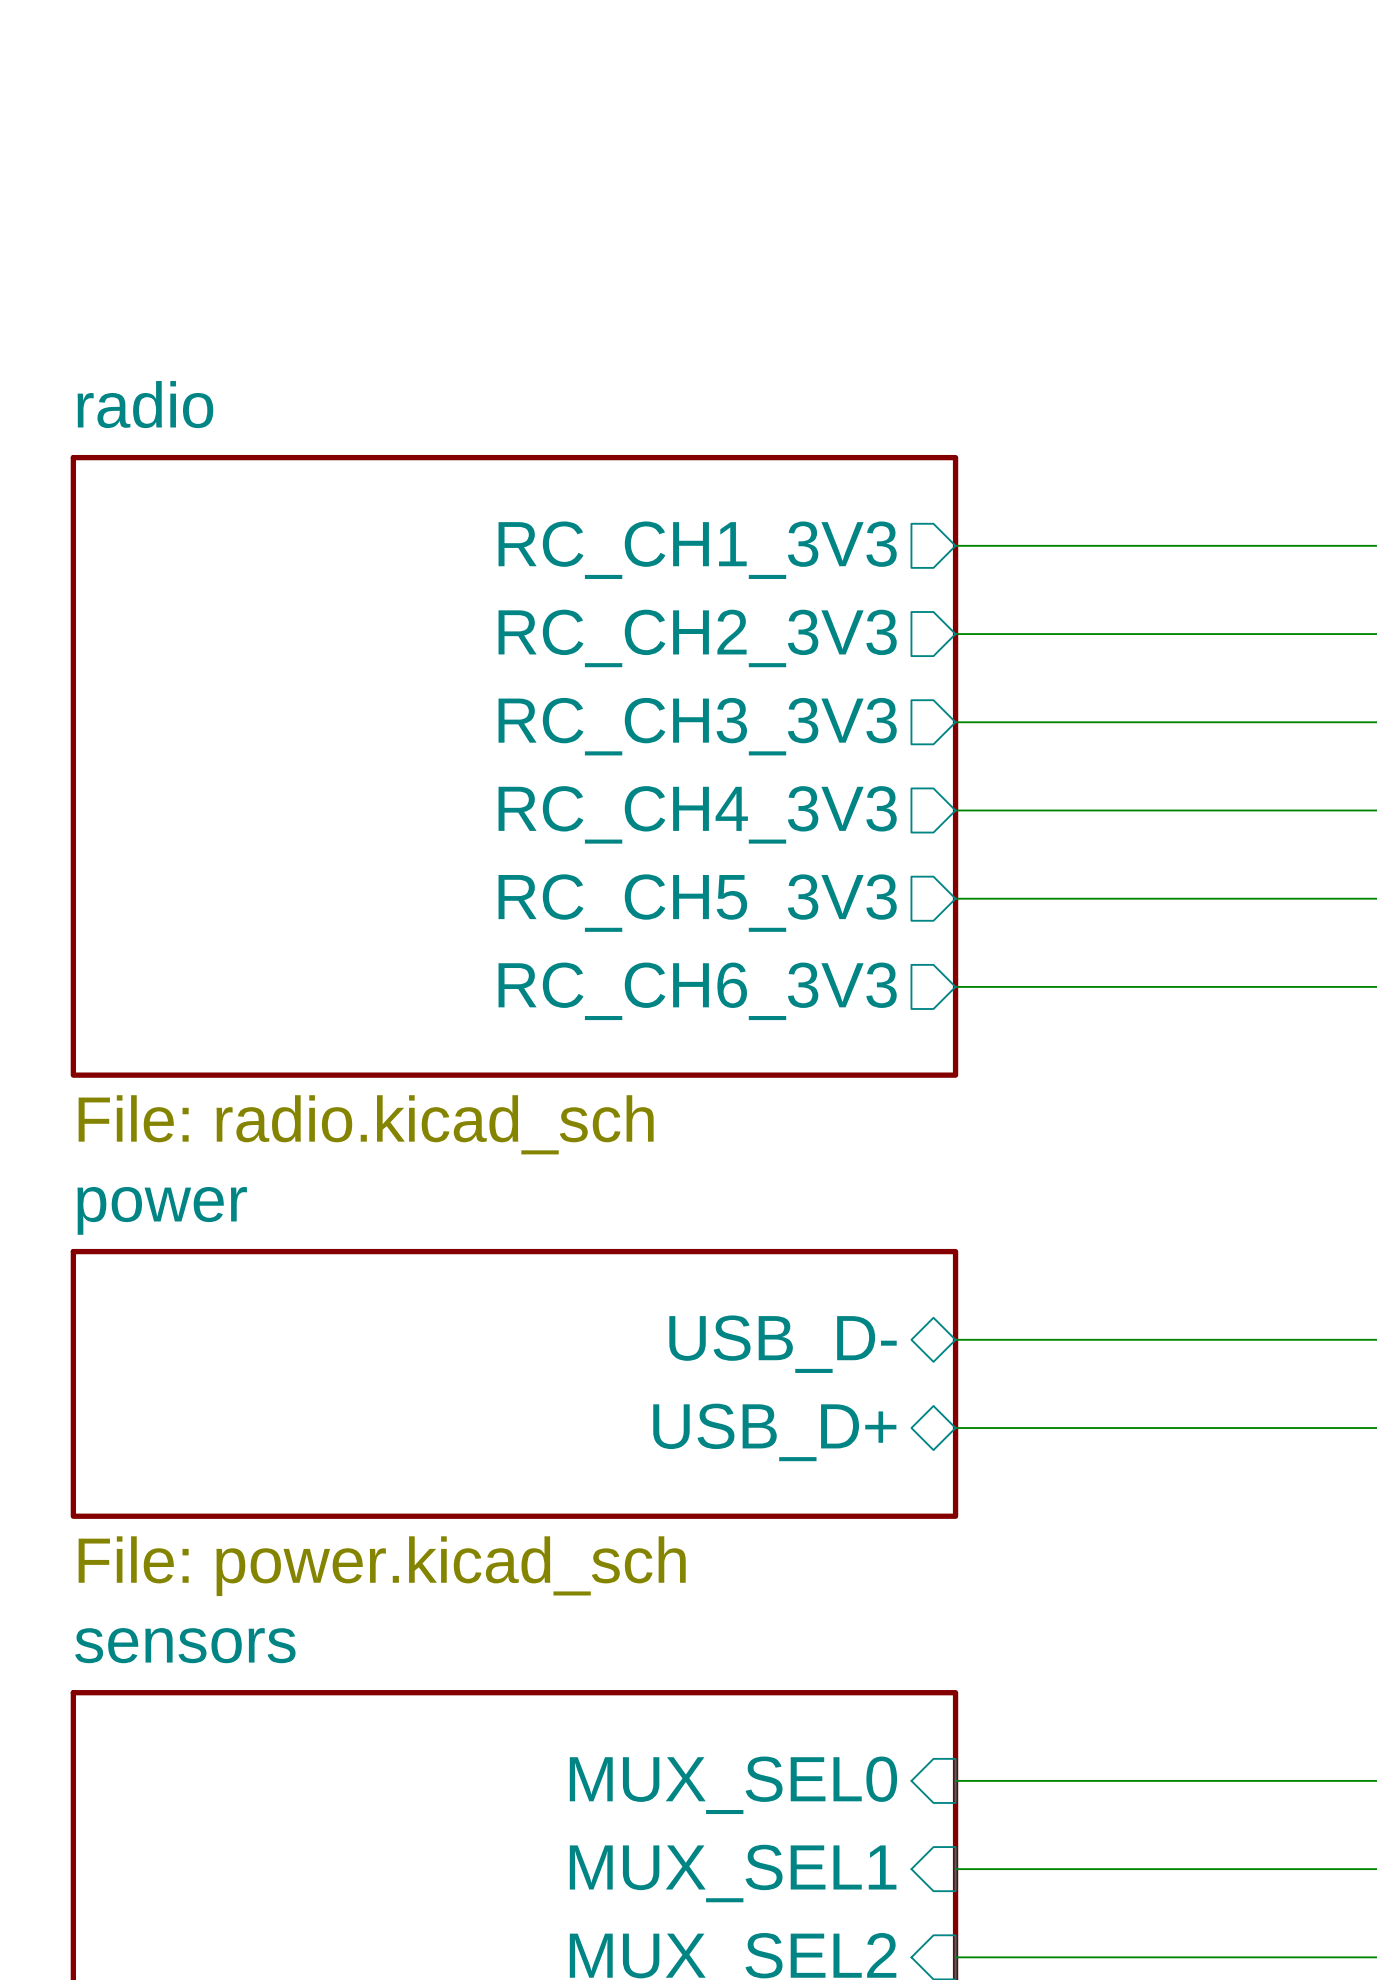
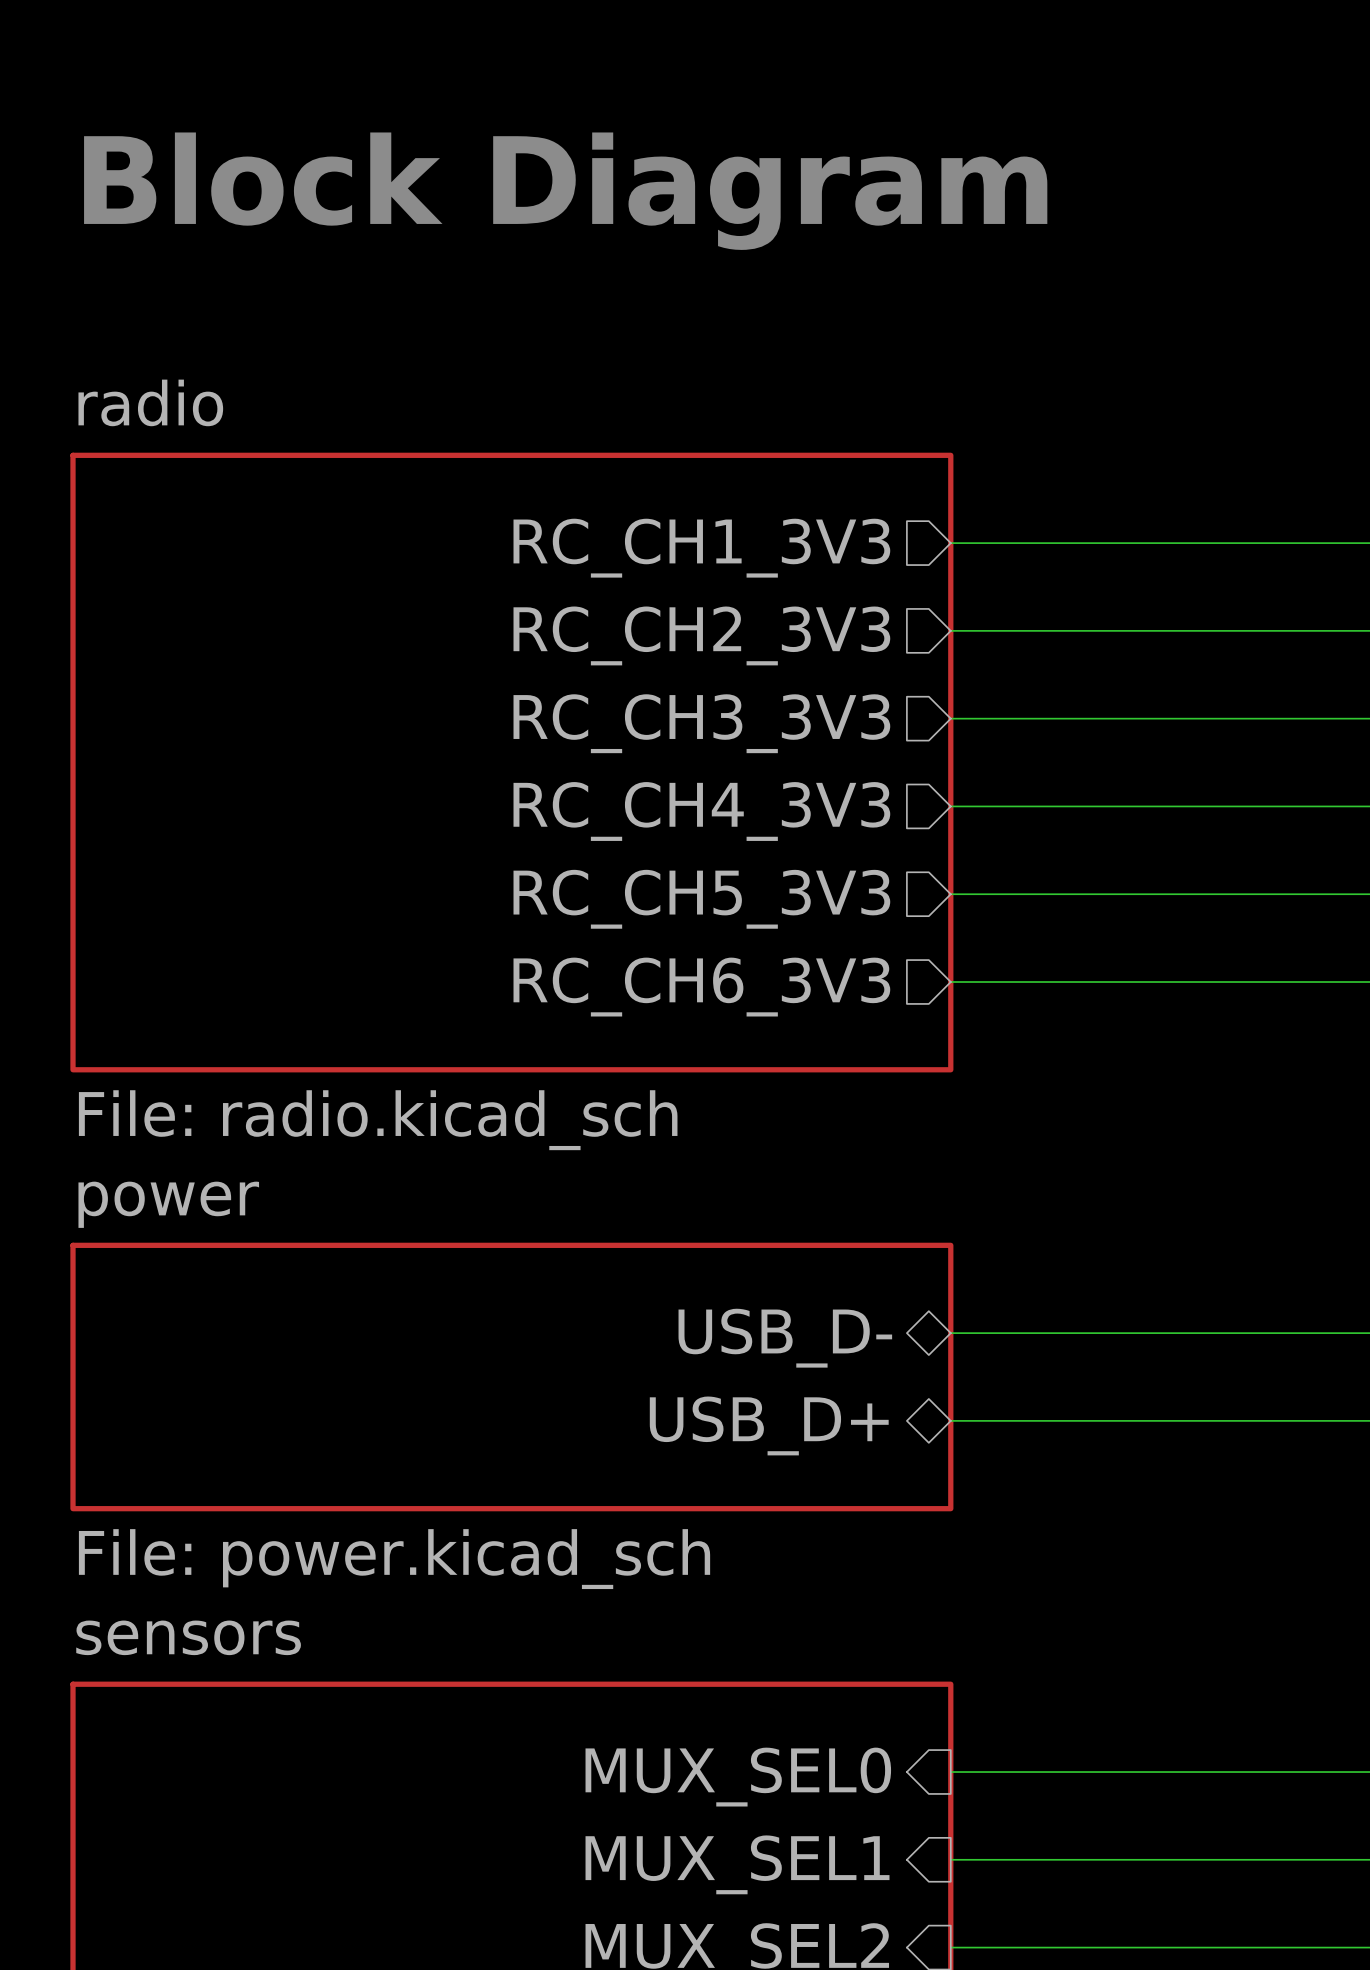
text: none -> Block Diagram (565, 191)

